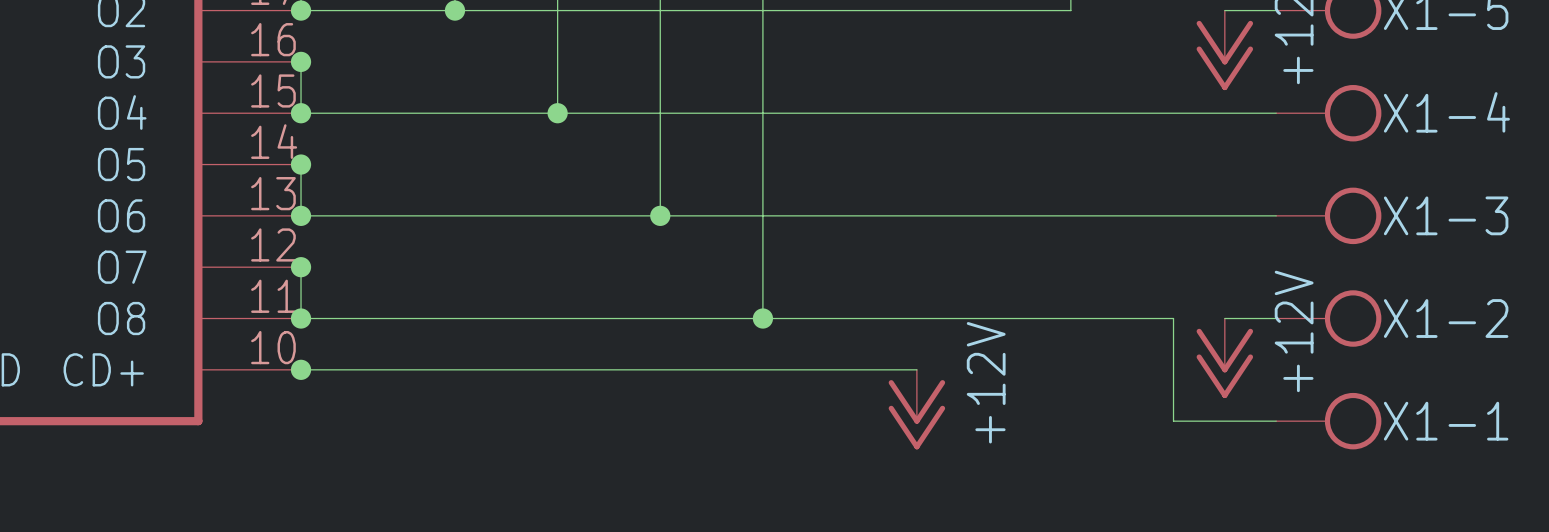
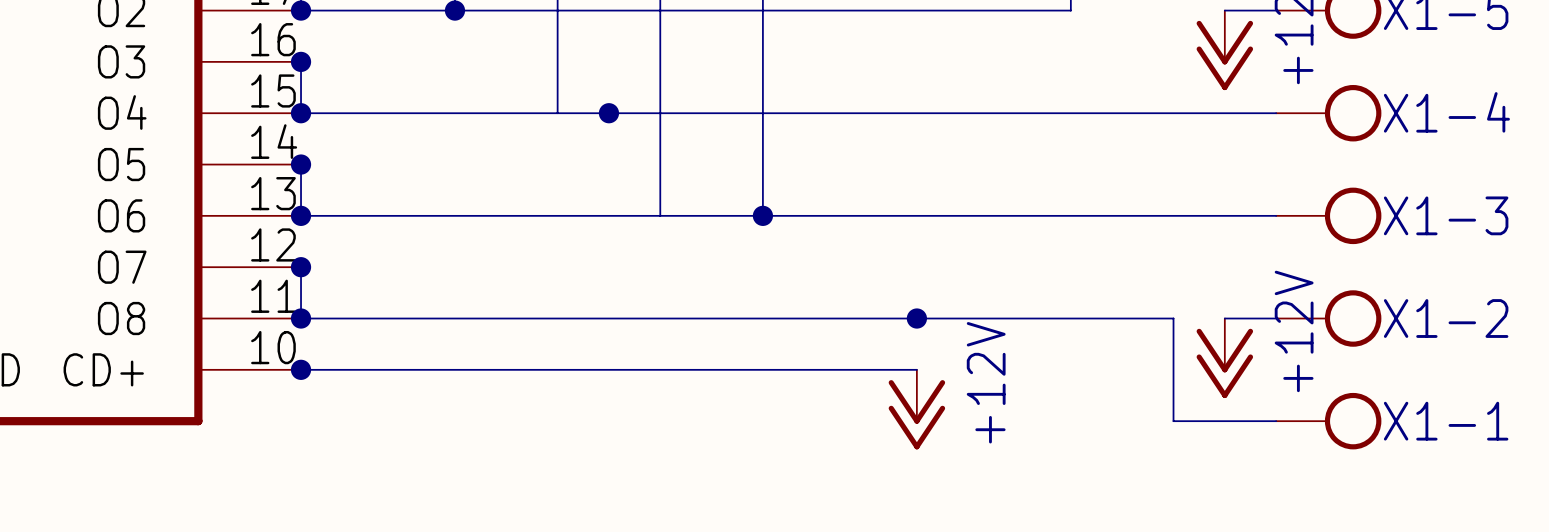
junction position: (557, 113) -> (608, 113)
junction: (660, 215) -> none
wire: (762, 215) (762, 318) -> none
junction: none -> (762, 215)
junction: (762, 318) -> none
junction: none -> (916, 318)

